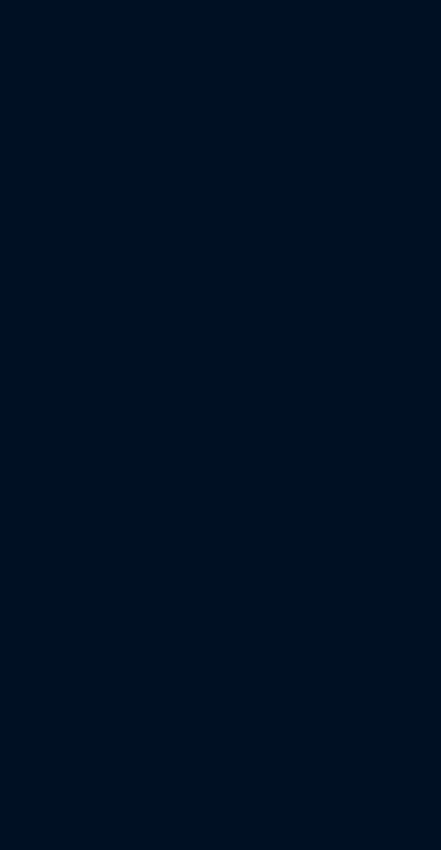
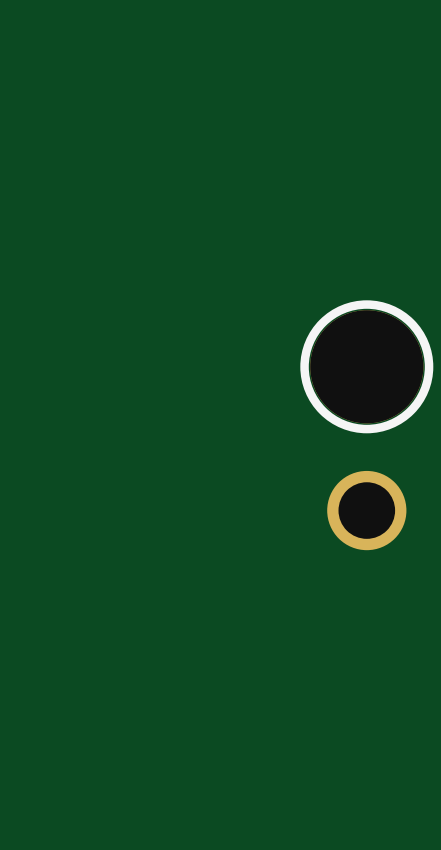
part: none -> (366, 366)
part: none -> (366, 510)

